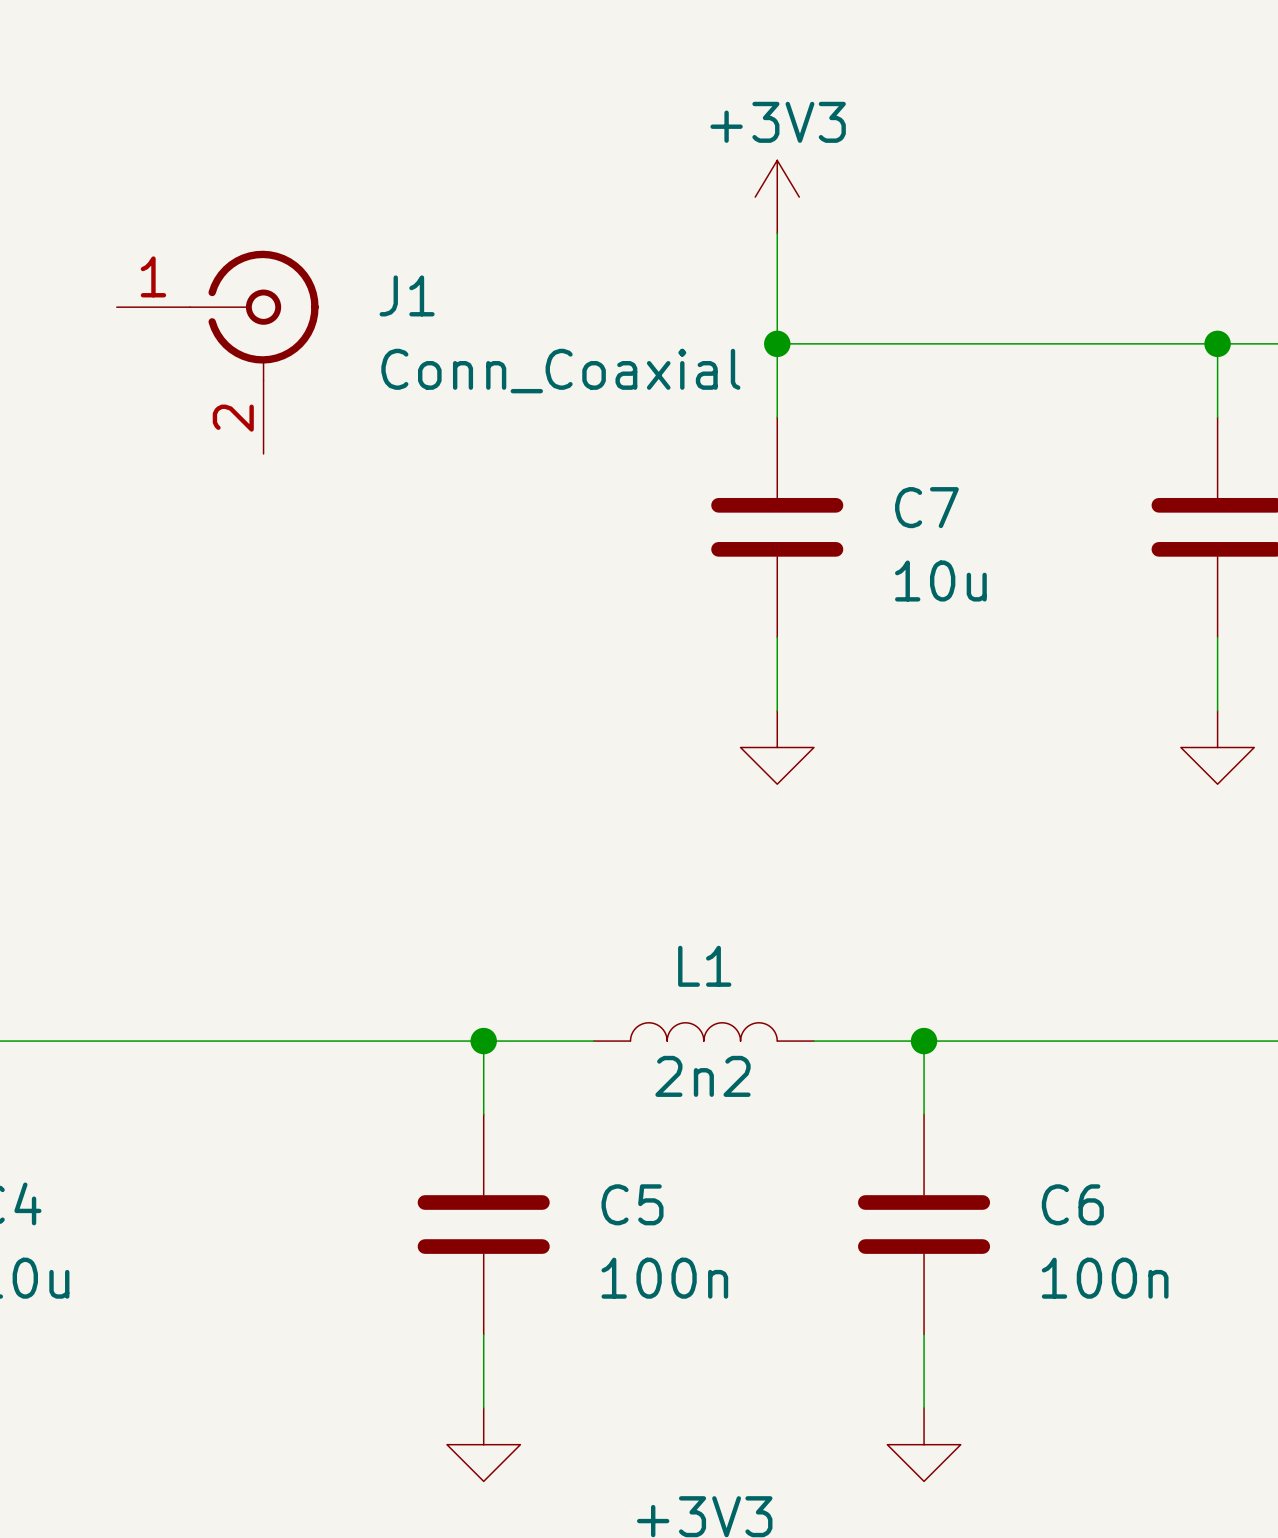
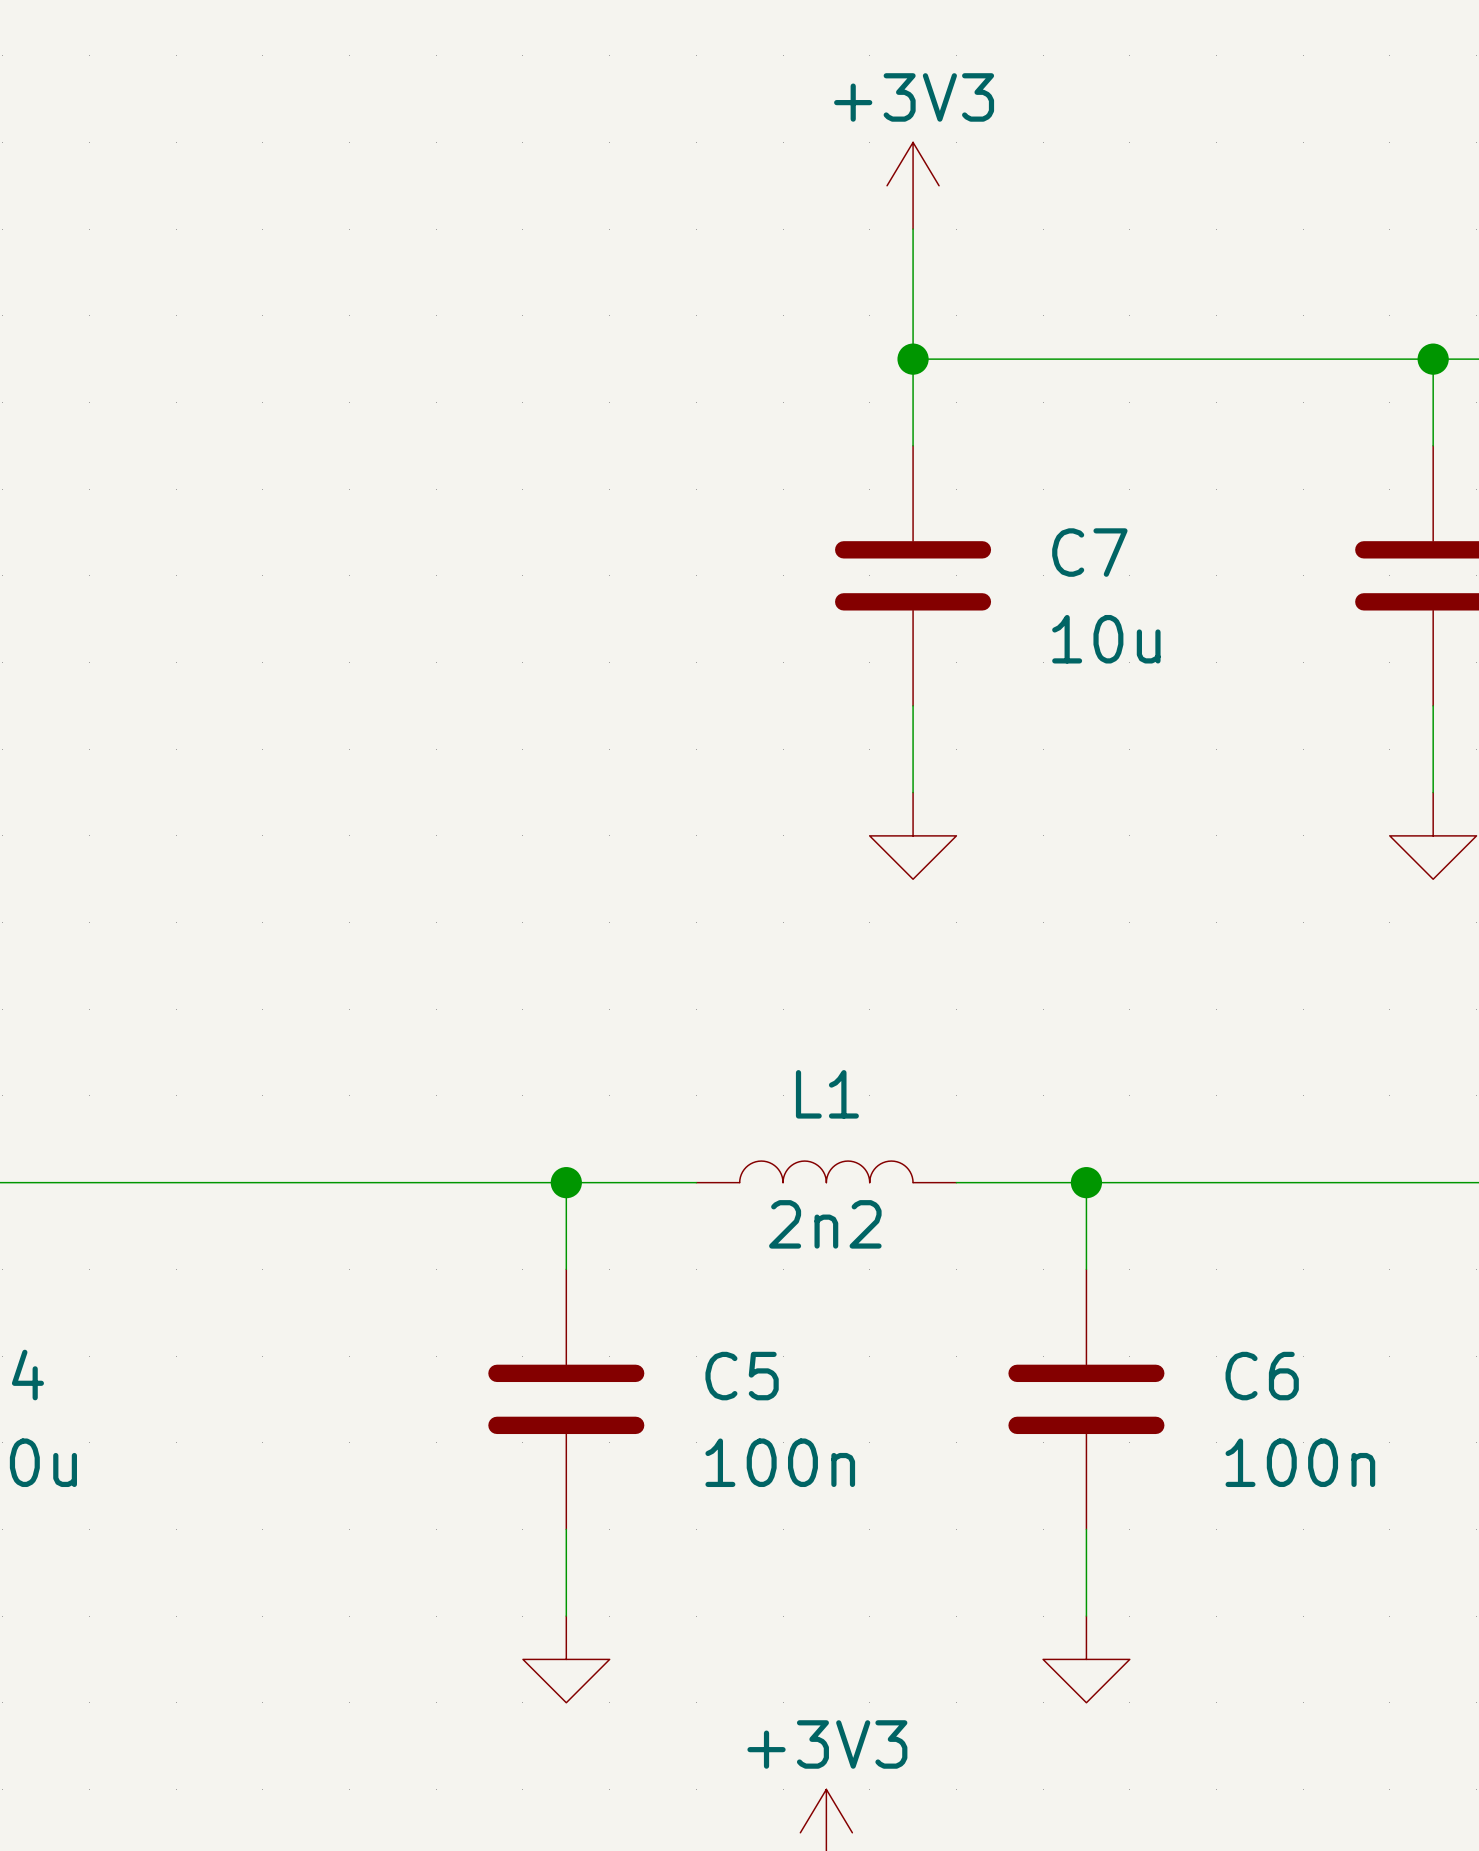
J1: Conn_Coaxial (217, 352) -> none

